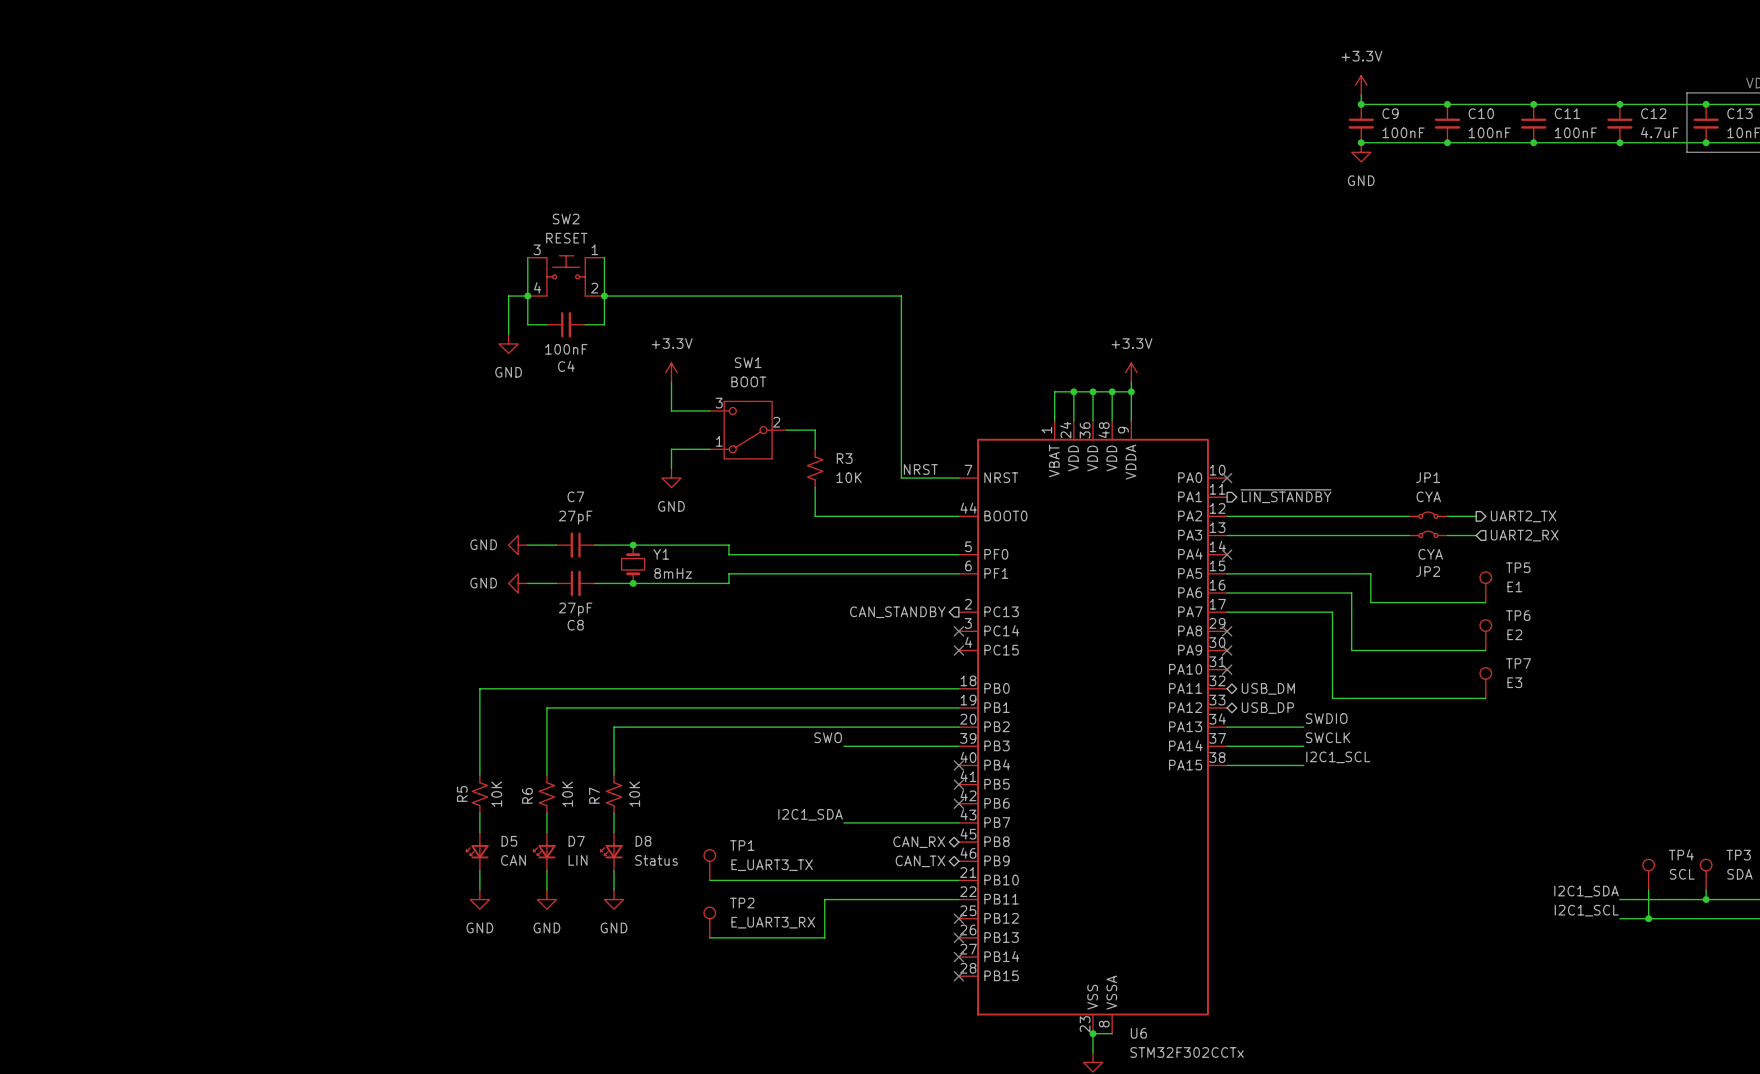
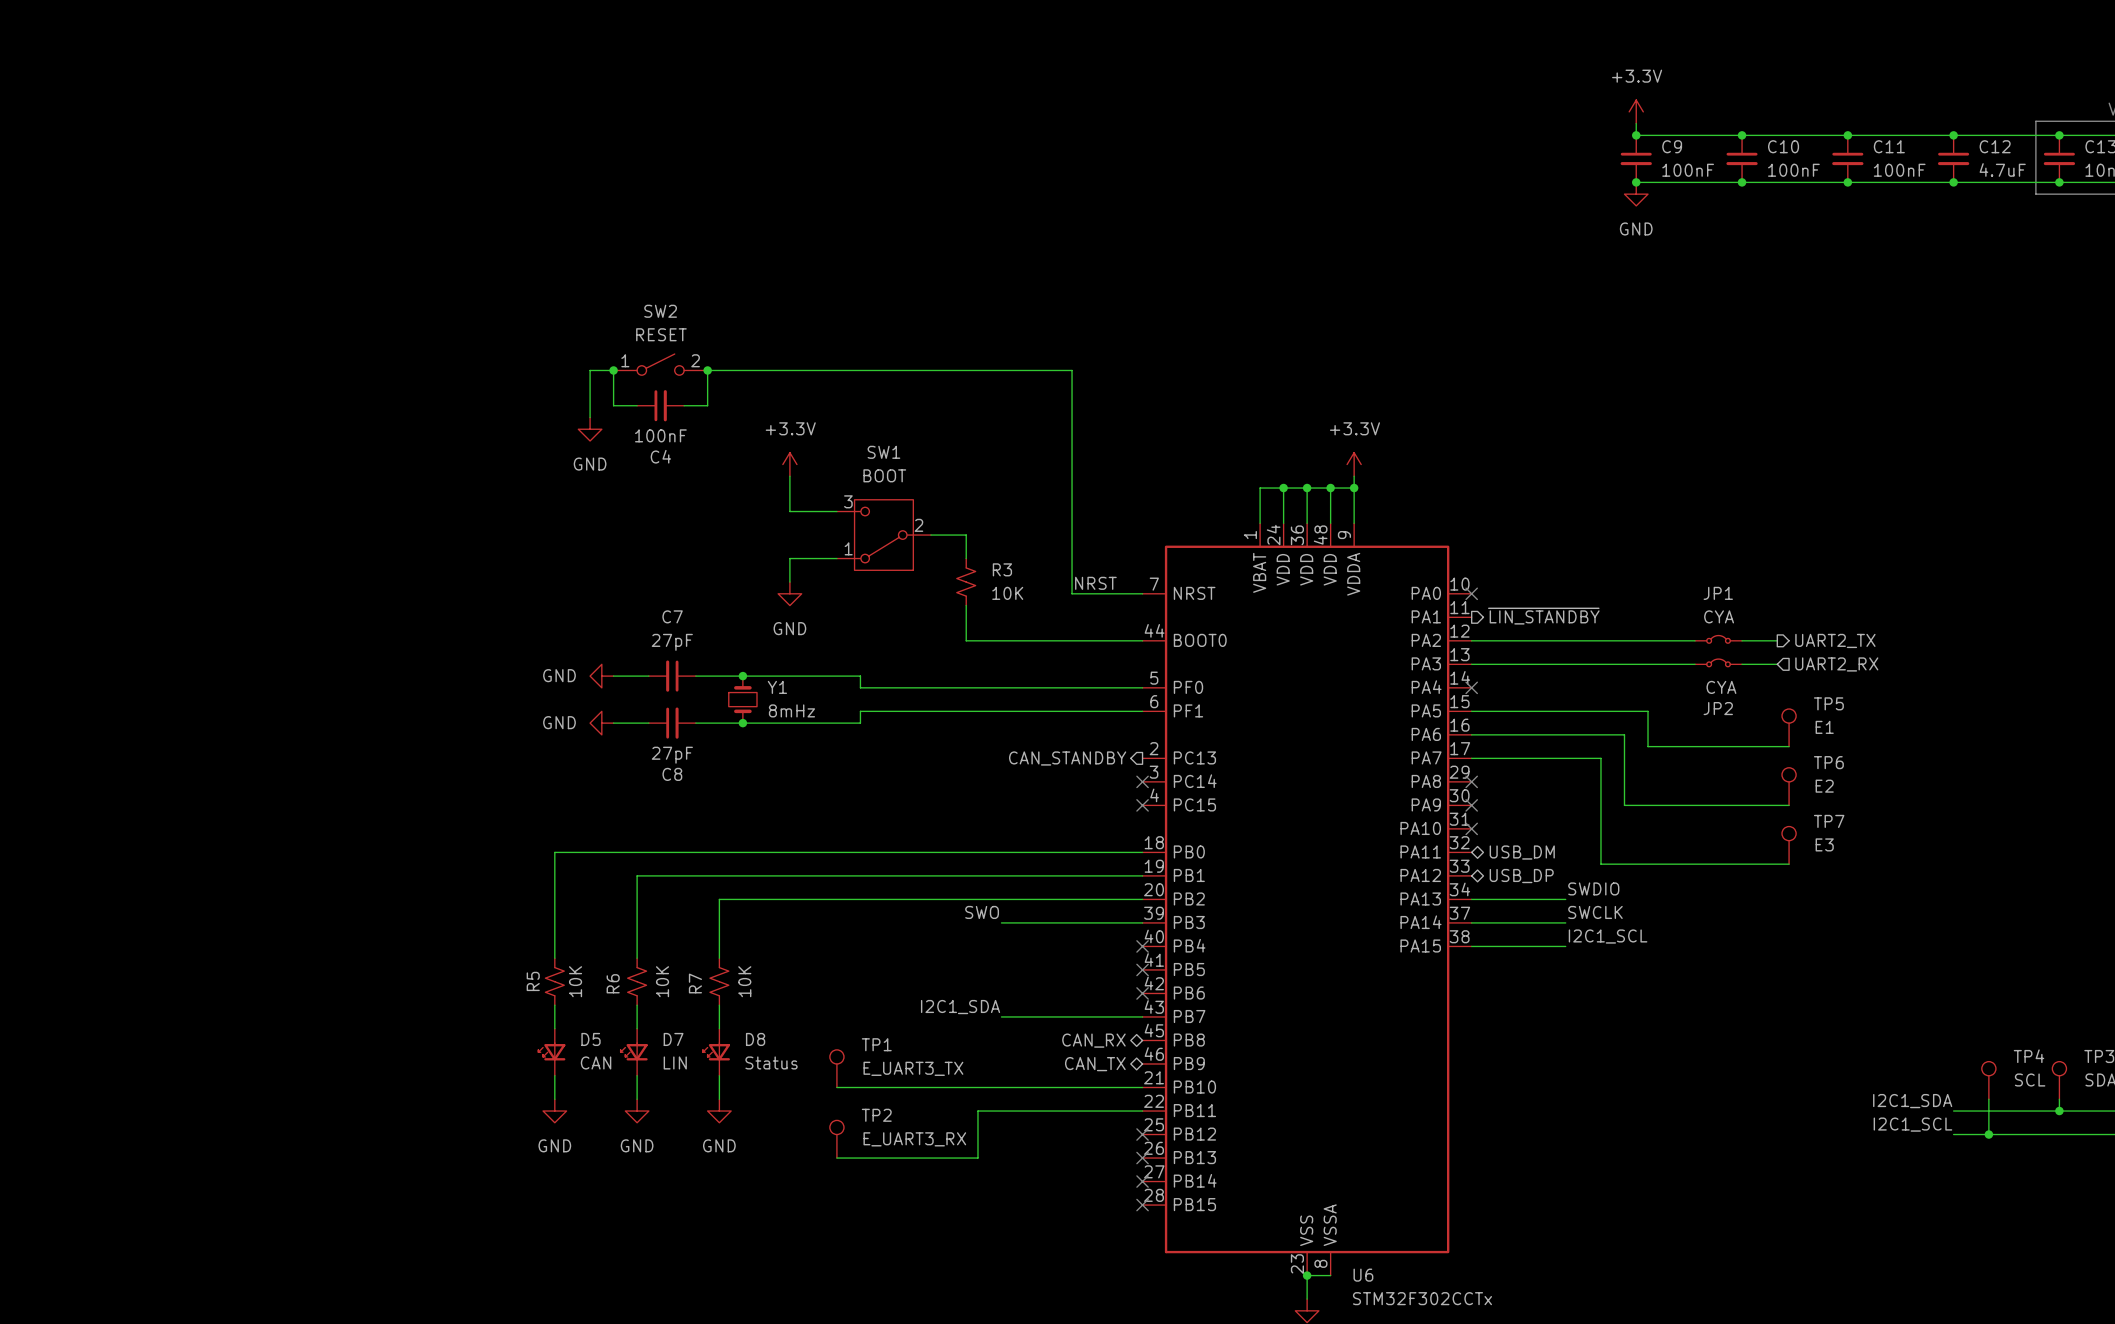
SW2 symbol: [527, 255, 605, 297] -> [613, 354, 708, 376]
wire: (527, 257) (527, 296) -> none
wire: (604, 257) (604, 296) -> none

